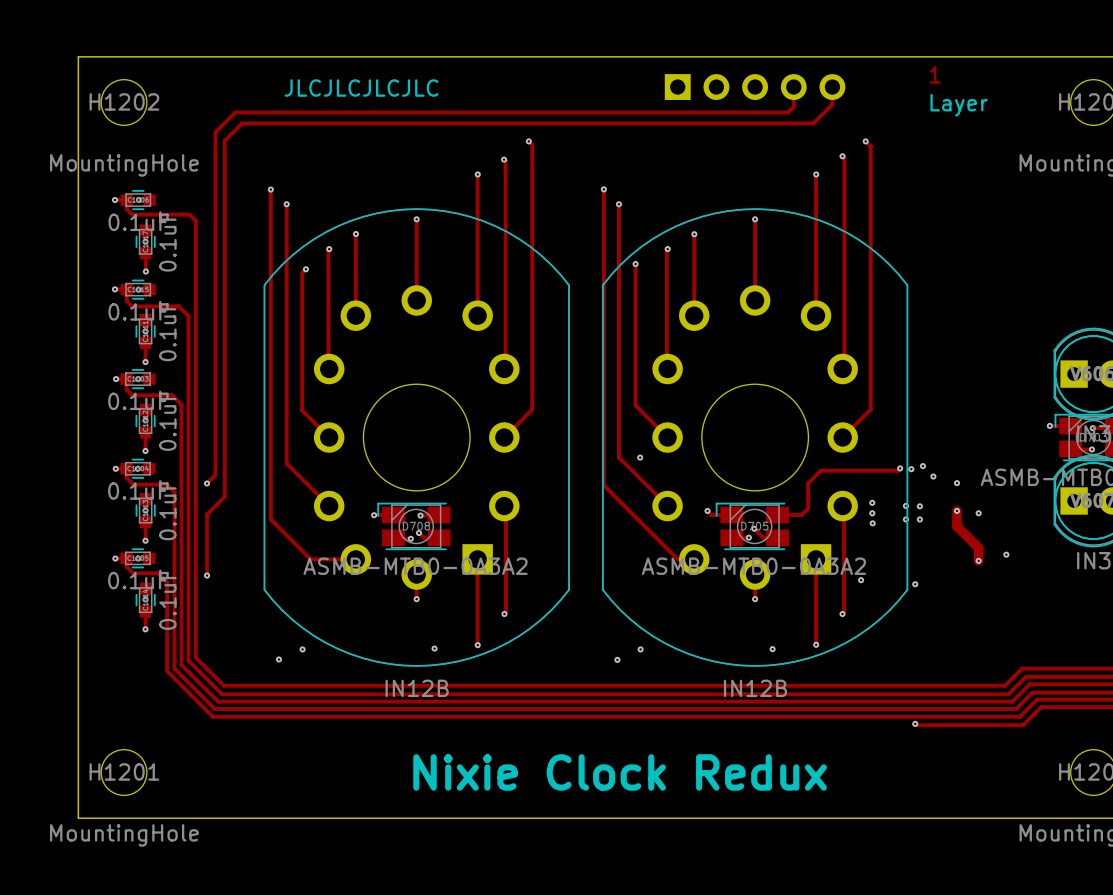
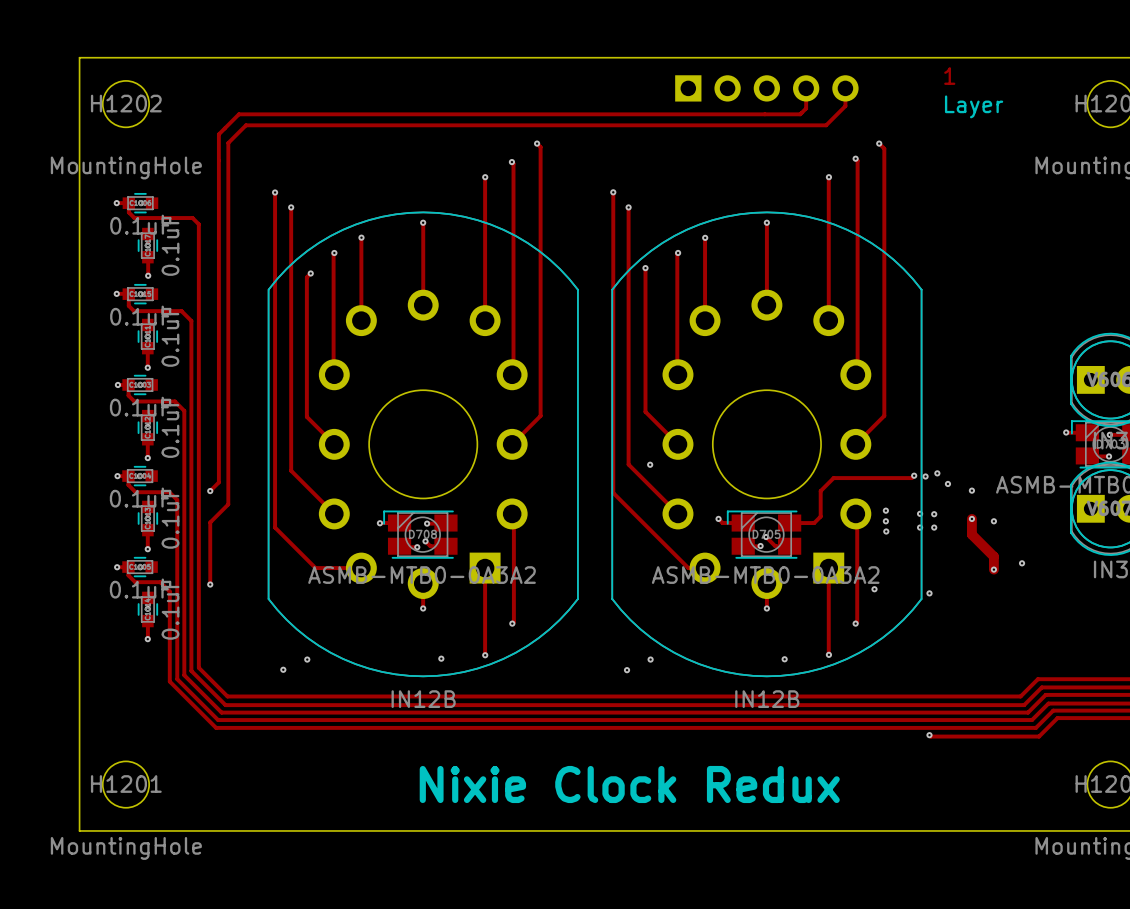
text: JLCJLCJLCJLC (361, 88) -> none

